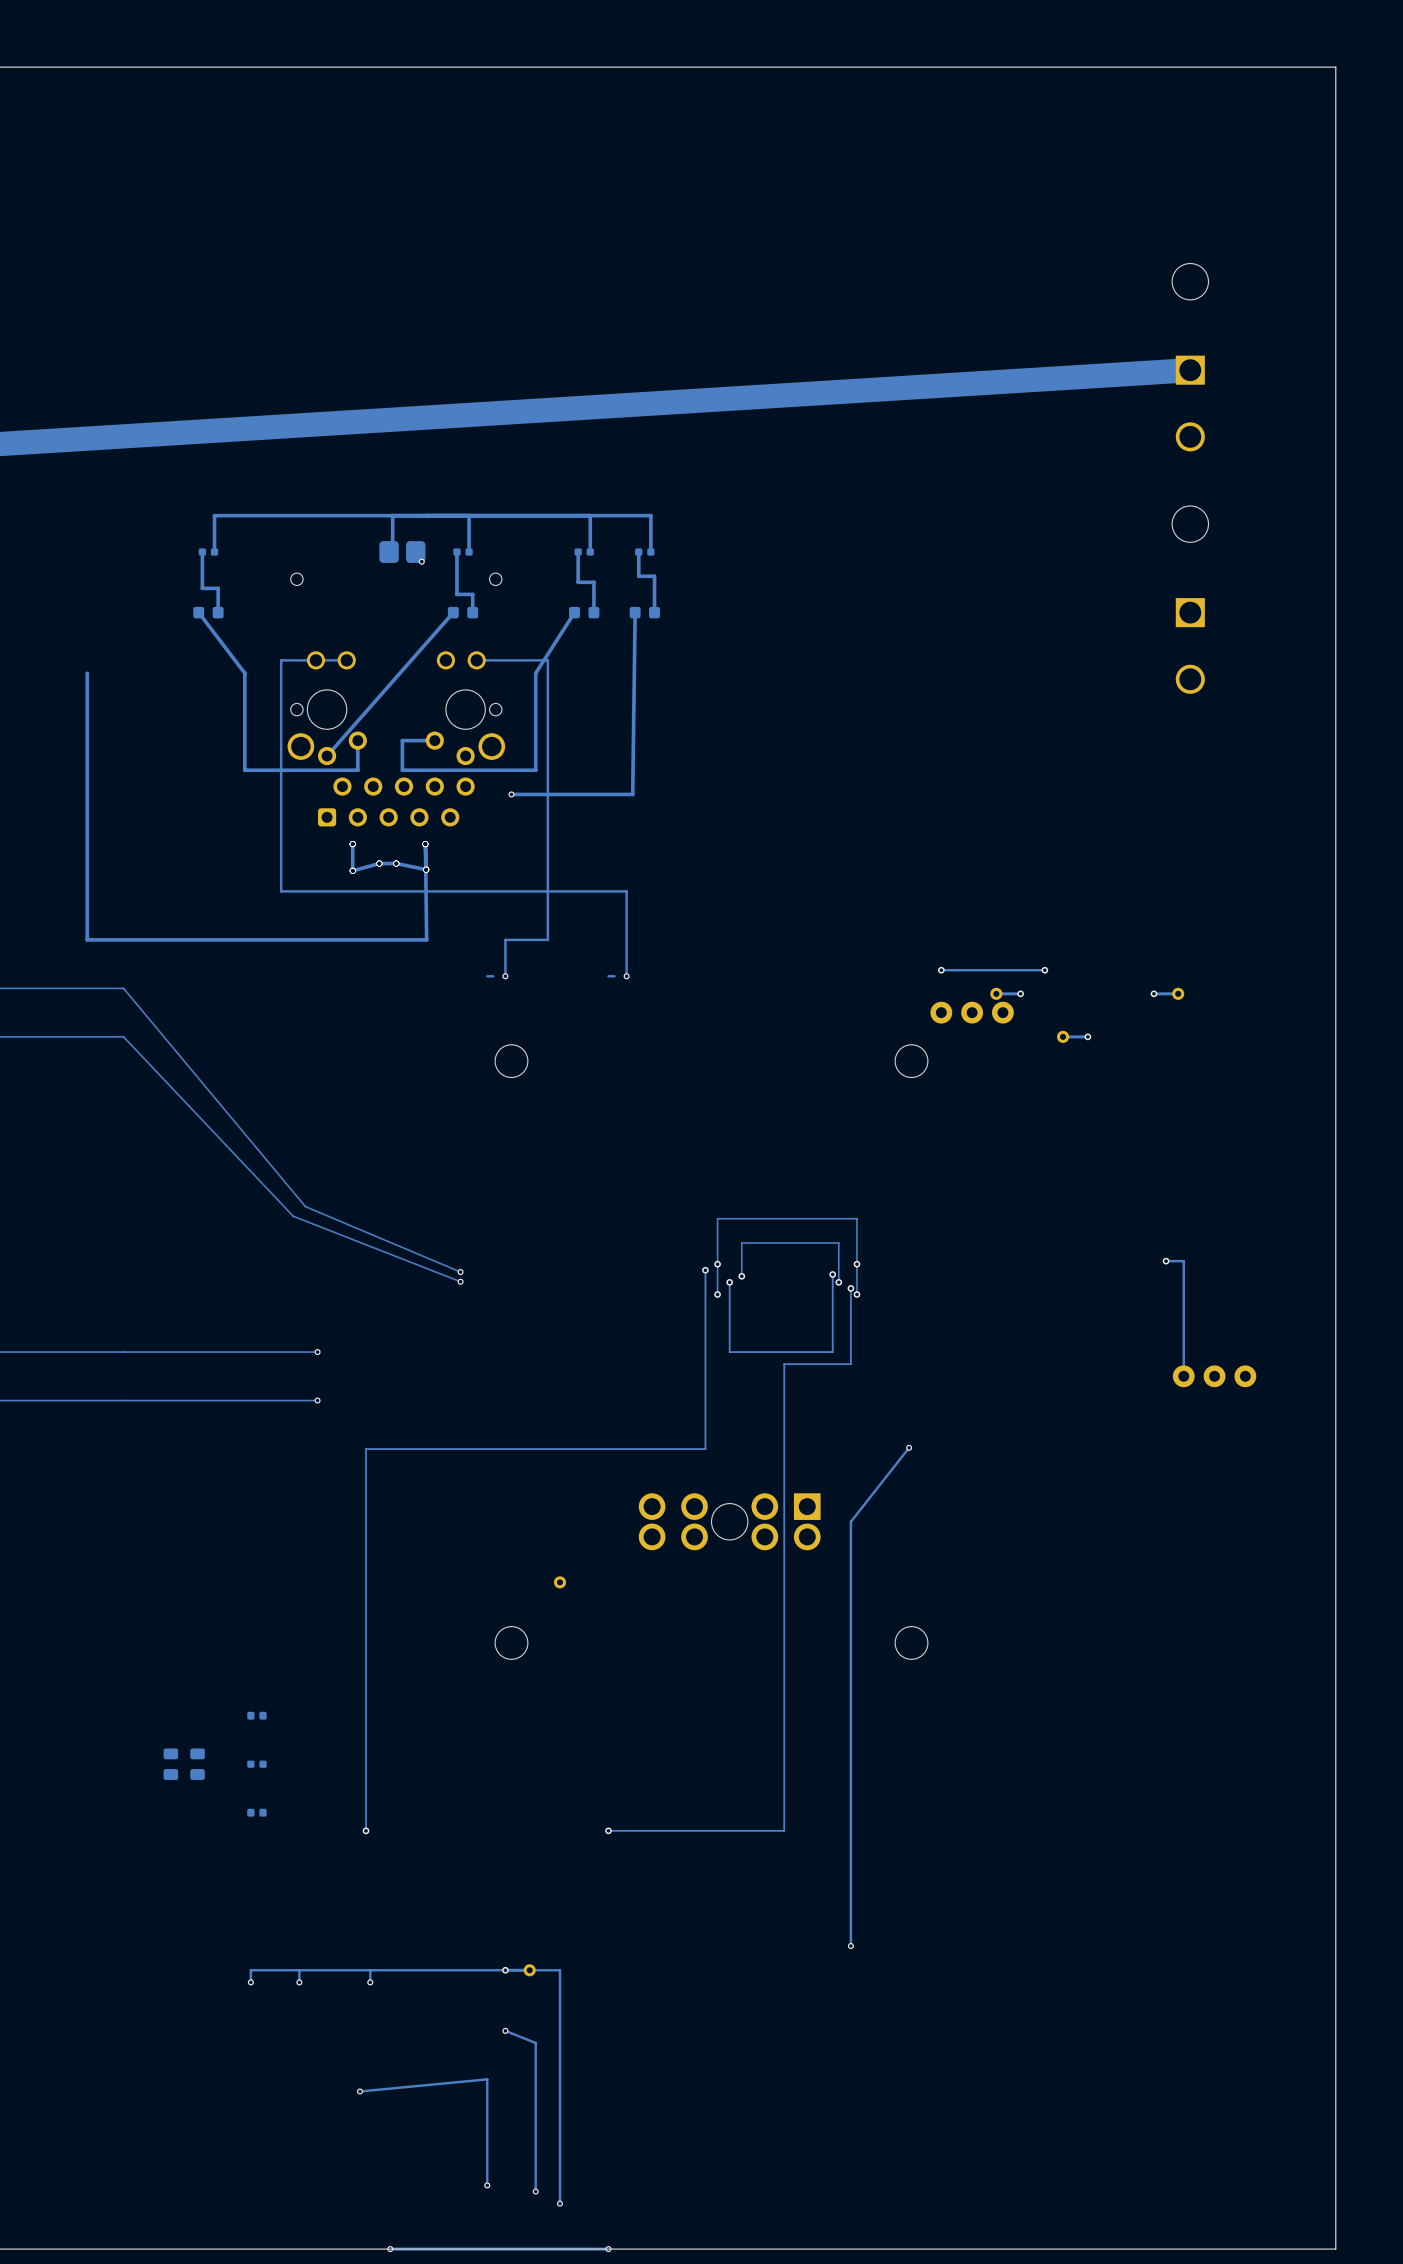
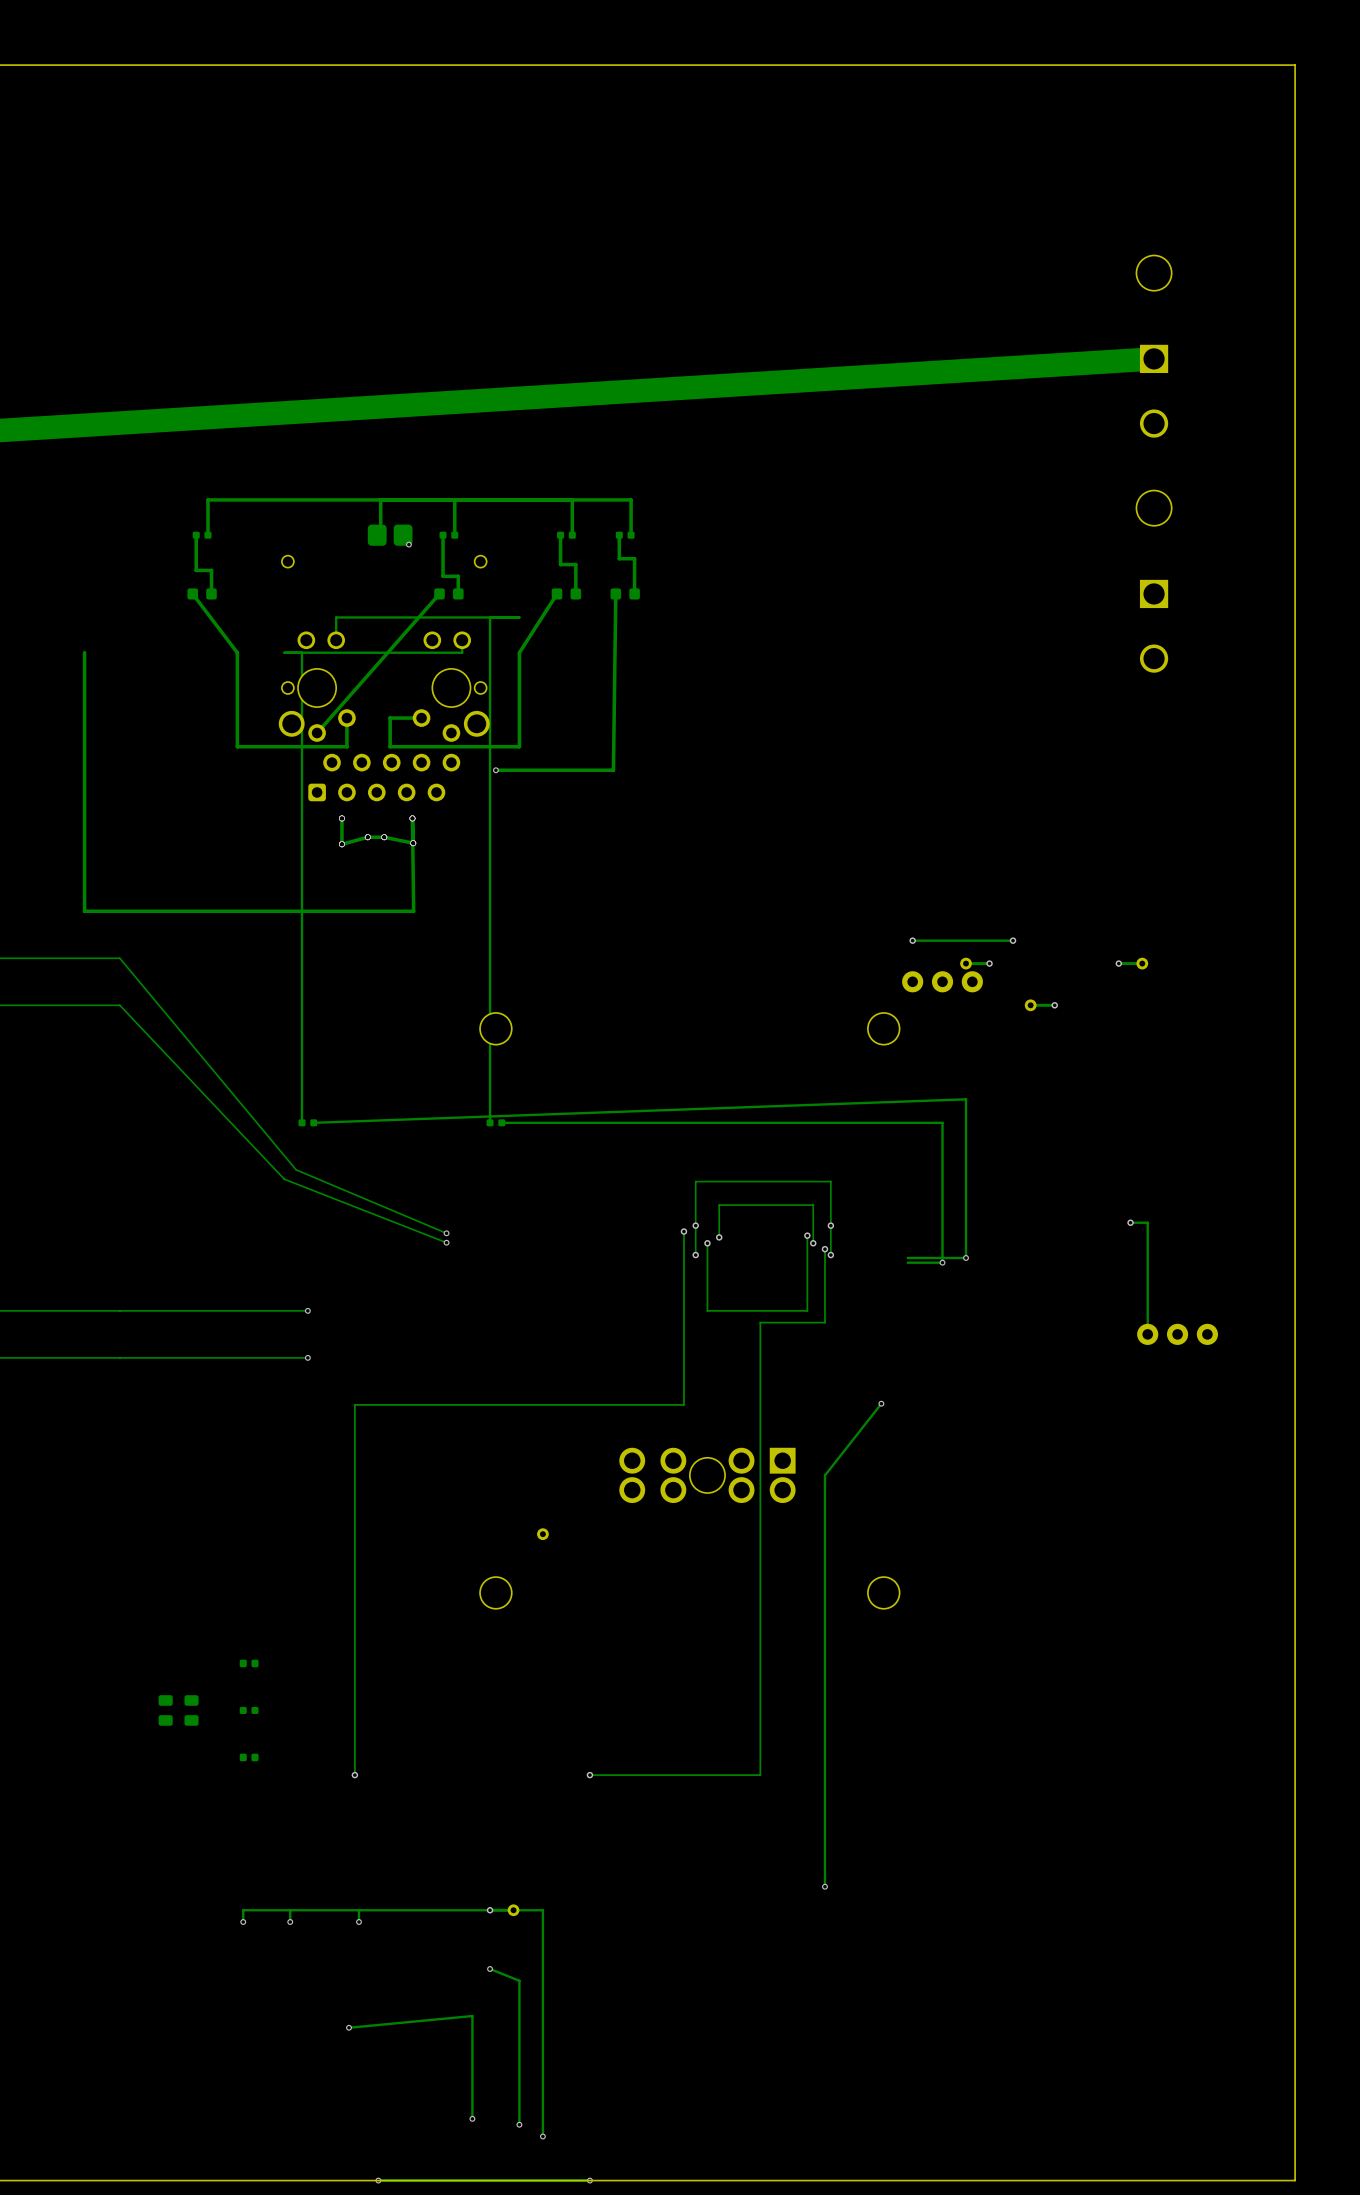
track: (346, 660) (281, 660) (281, 891) (626, 891) (626, 976) -> (336, 640) (336, 617) (519, 617)
track: (476, 660) (547, 660) (547, 939) (505, 939) -> (490, 617) (490, 911)
track: none -> (462, 640) (462, 652) (284, 652)
track: none -> (301, 652) (301, 1122)
track: (493, 976) (487, 976) -> none
track: none -> (490, 946) (490, 1122)
via: (505, 976) -> none
track: (614, 976) (608, 976) -> none
via: (626, 976) -> none
part: none -> (307, 1122)
track: none -> (313, 1122) (966, 1099) (966, 1257) (907, 1257)
part: none -> (495, 1122)
track: none -> (501, 1122) (942, 1122) (942, 1262) (907, 1262)
via: none -> (966, 1257)
via: none -> (942, 1262)

